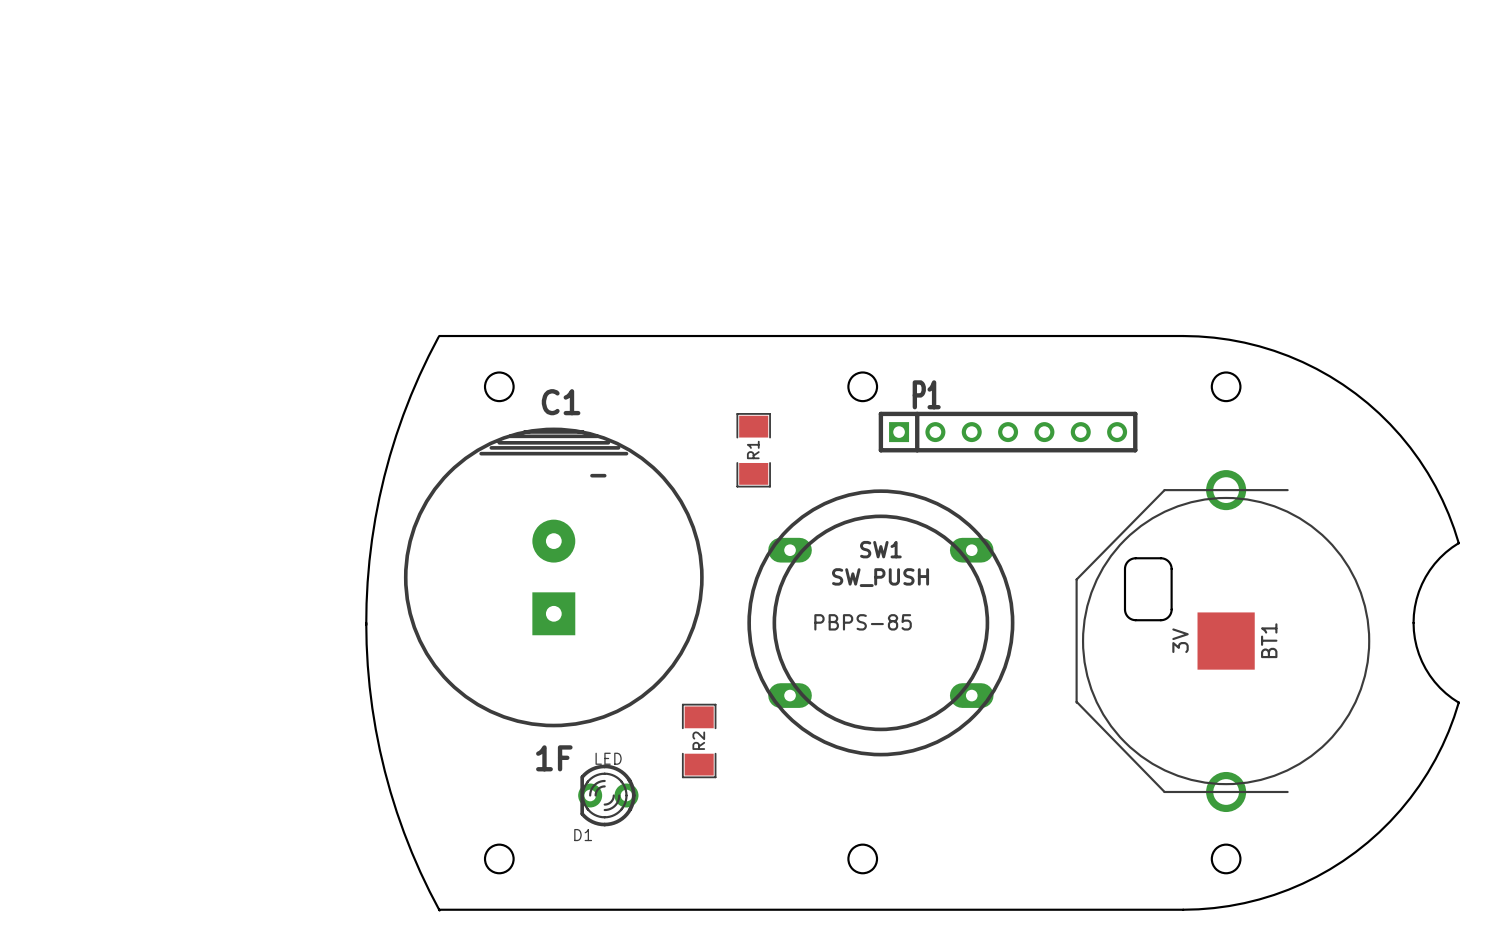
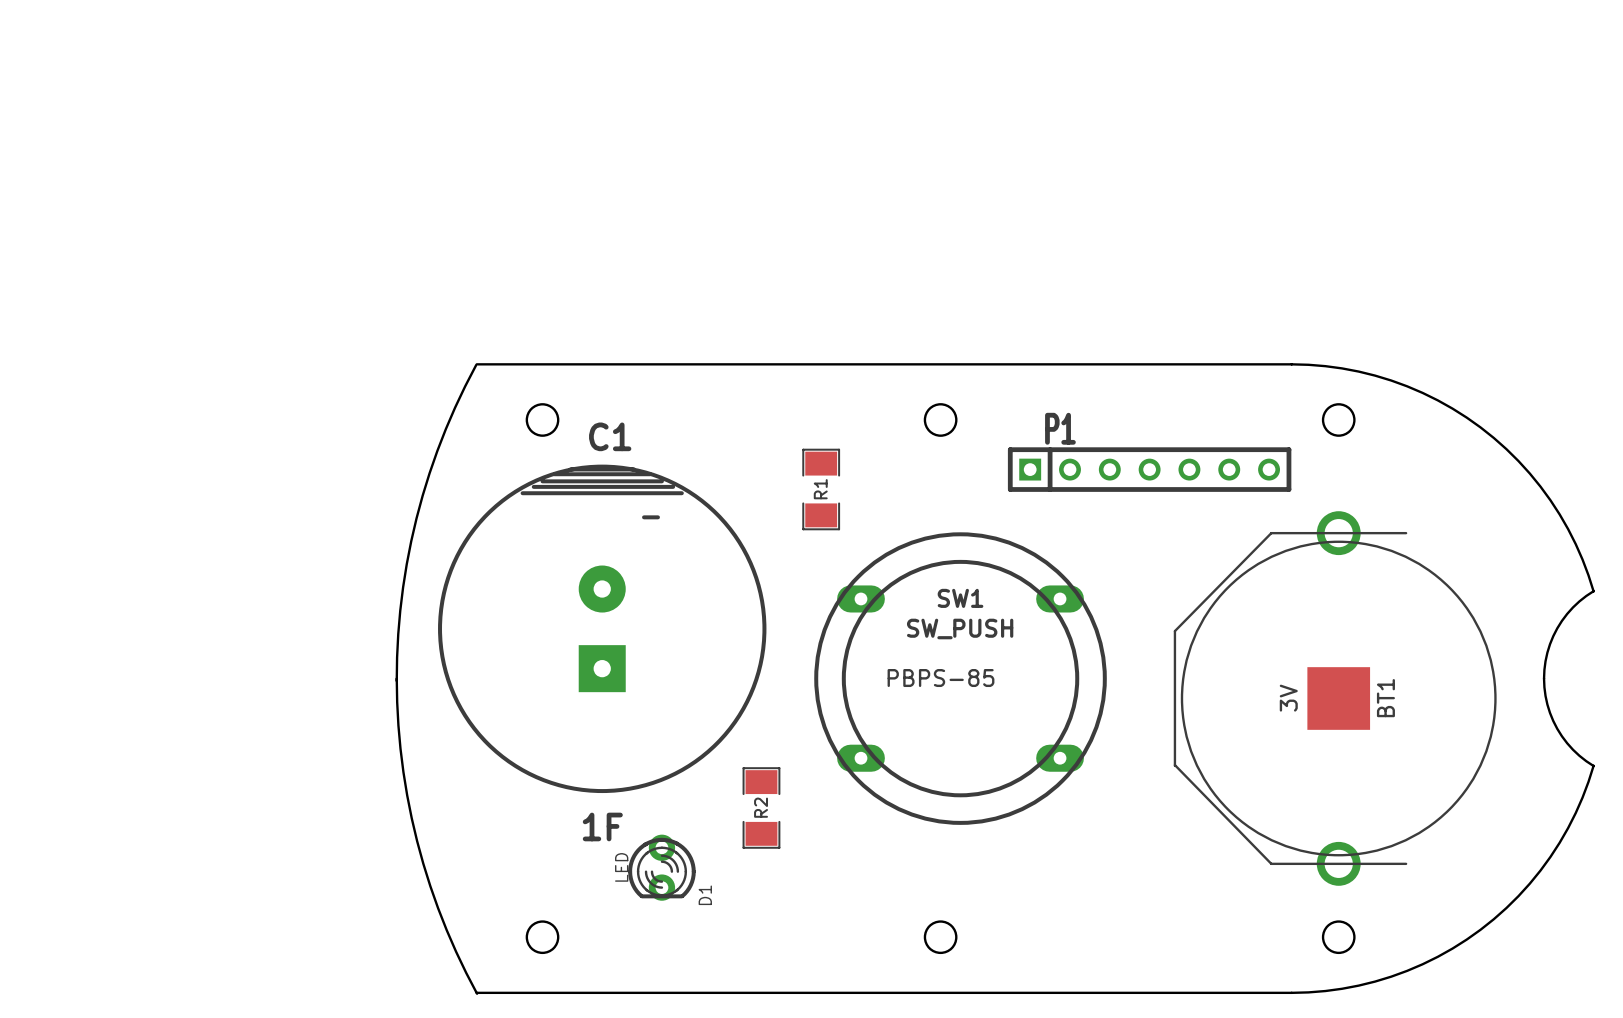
P1 position: (1008, 432) -> (1149, 469)
part: (1148, 589) -> none
D1 rotation: 0° (608, 795) -> 90° counterclockwise (661, 867)

